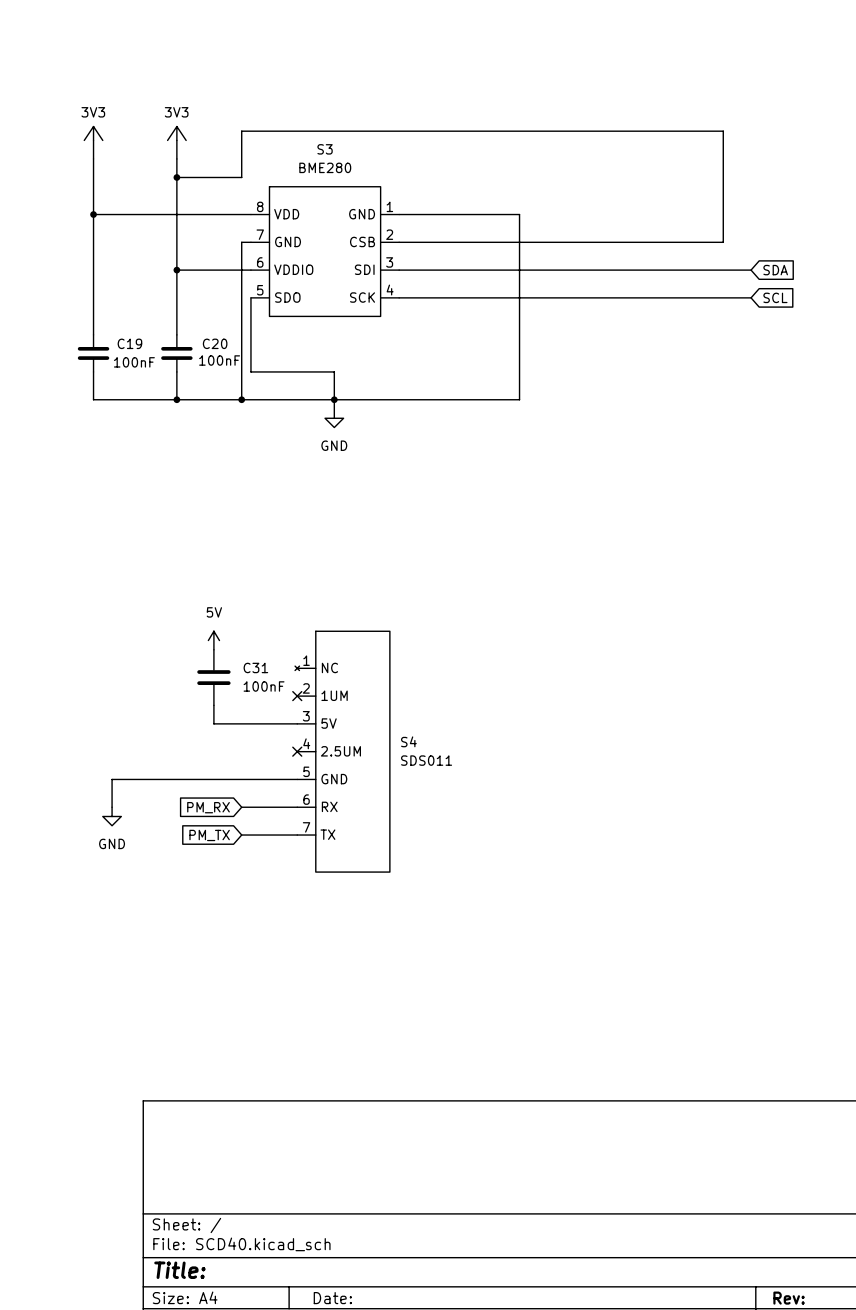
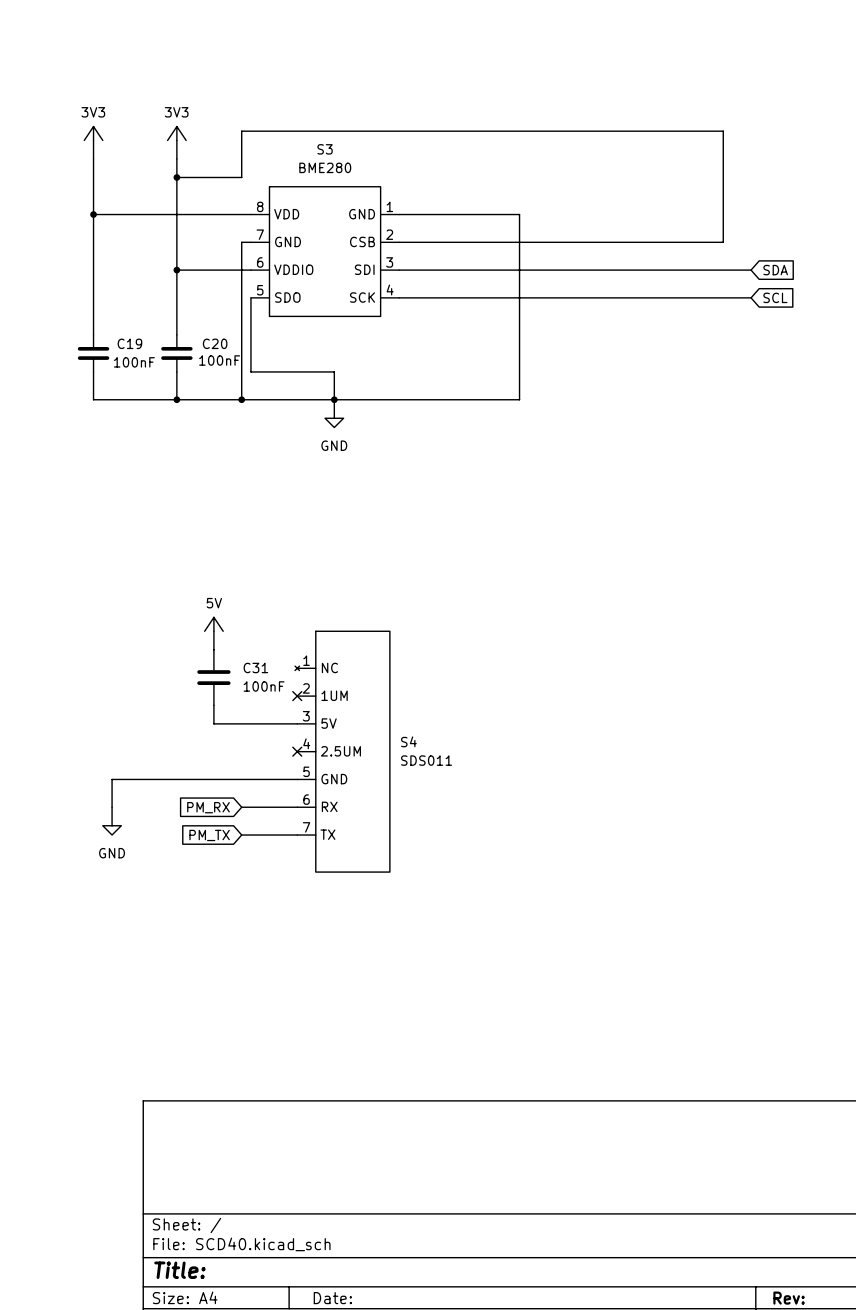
power symbol shape: [208, 631, 220, 650] -> [204, 617, 224, 650]
power symbol shape: [102, 807, 122, 826] -> [102, 807, 122, 836]

